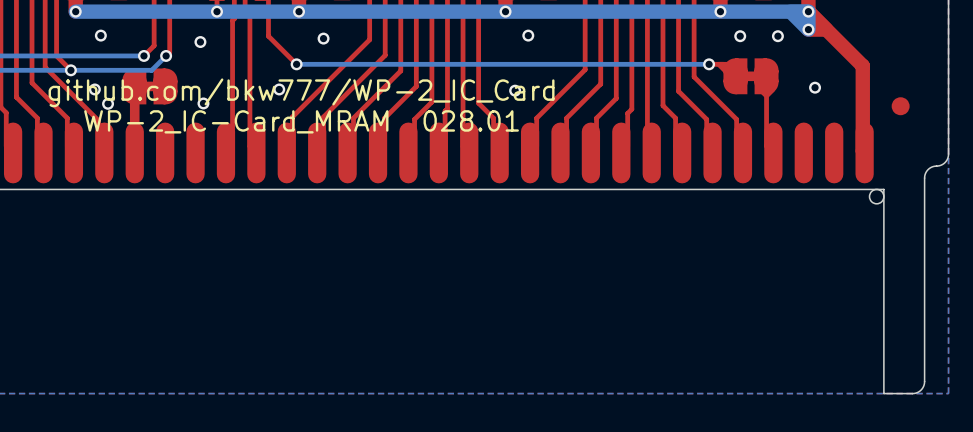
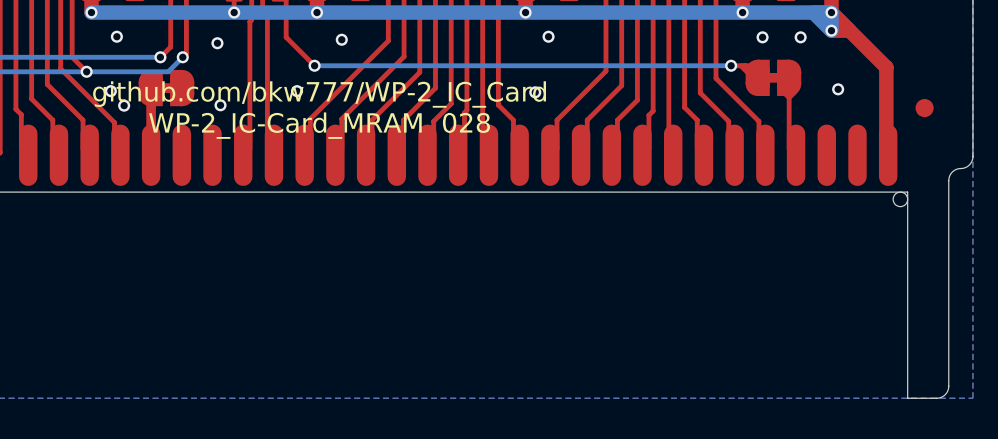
text: WP-2_IC-Card_MRAM 028.01 (301, 121) -> WP-2_IC-Card_MRAM 028 (319, 125)

